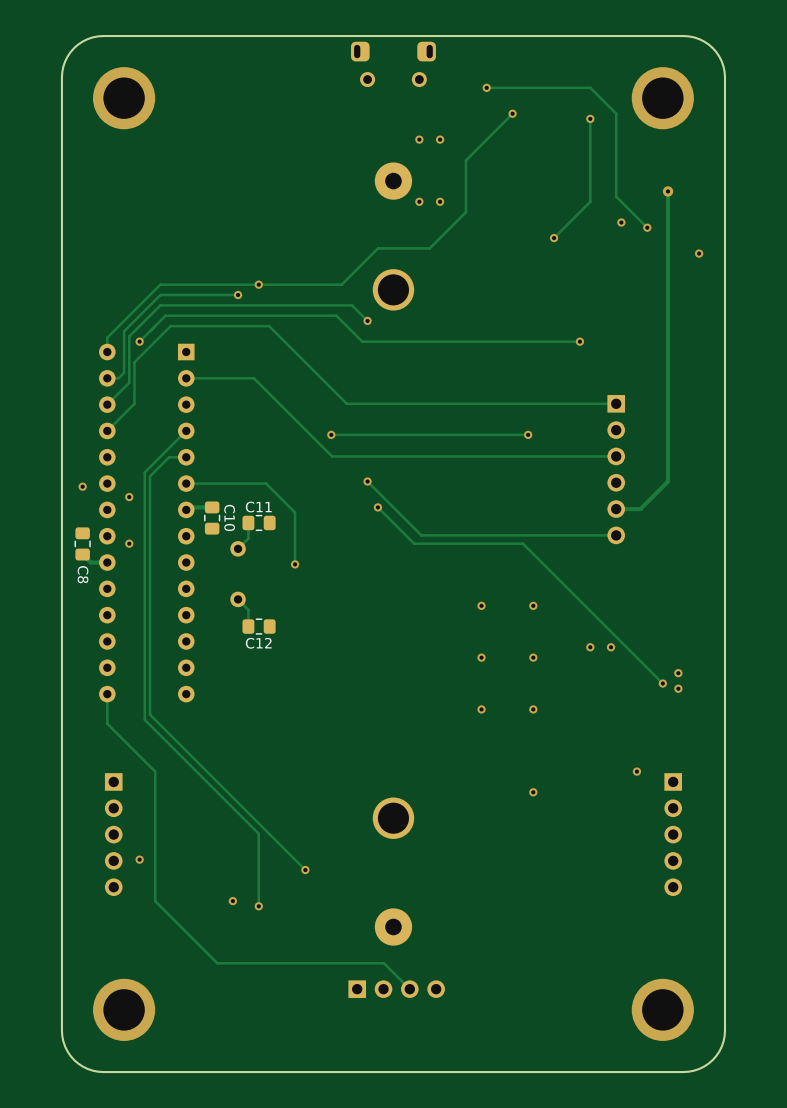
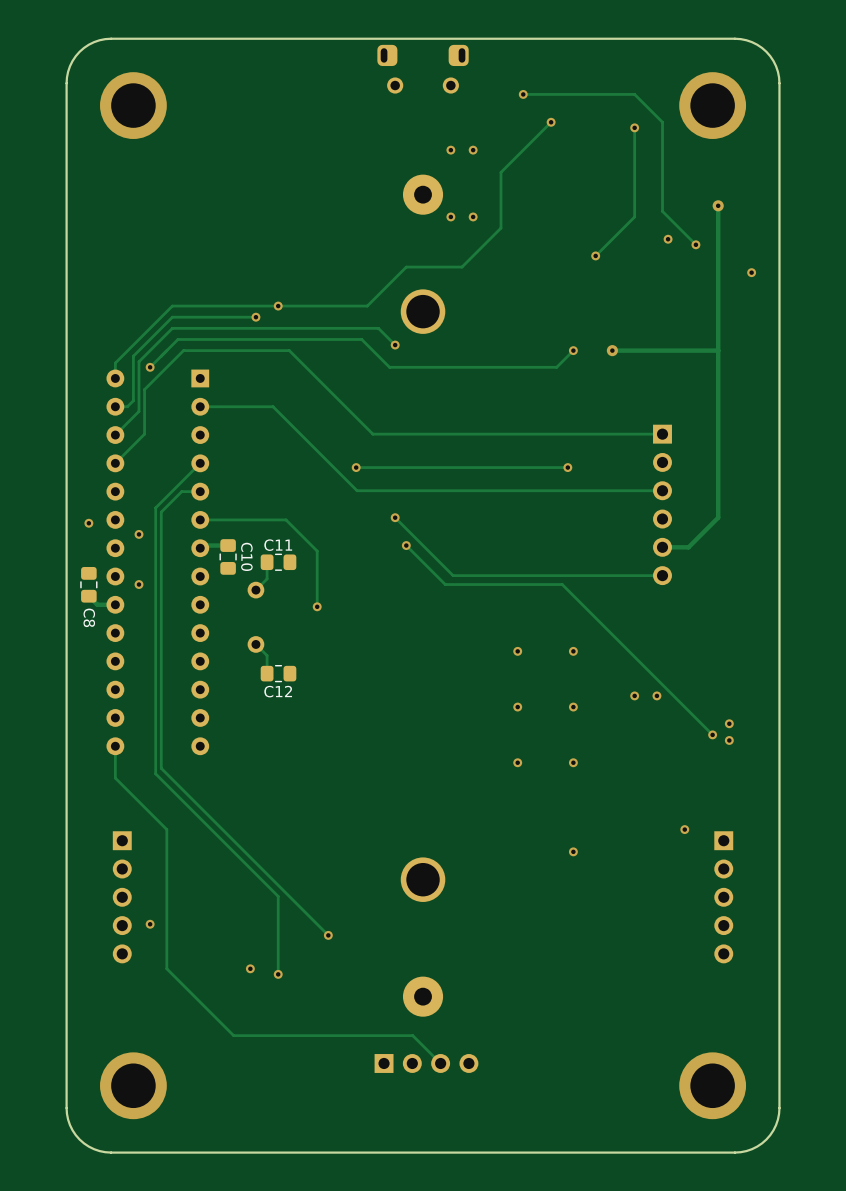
via: none -> (612, 350)
track: none -> (718, 350) (612, 350)
track: (579, 341) (517, 341) -> (573, 350) (556, 367)
via position: (579, 341) -> (573, 350)

